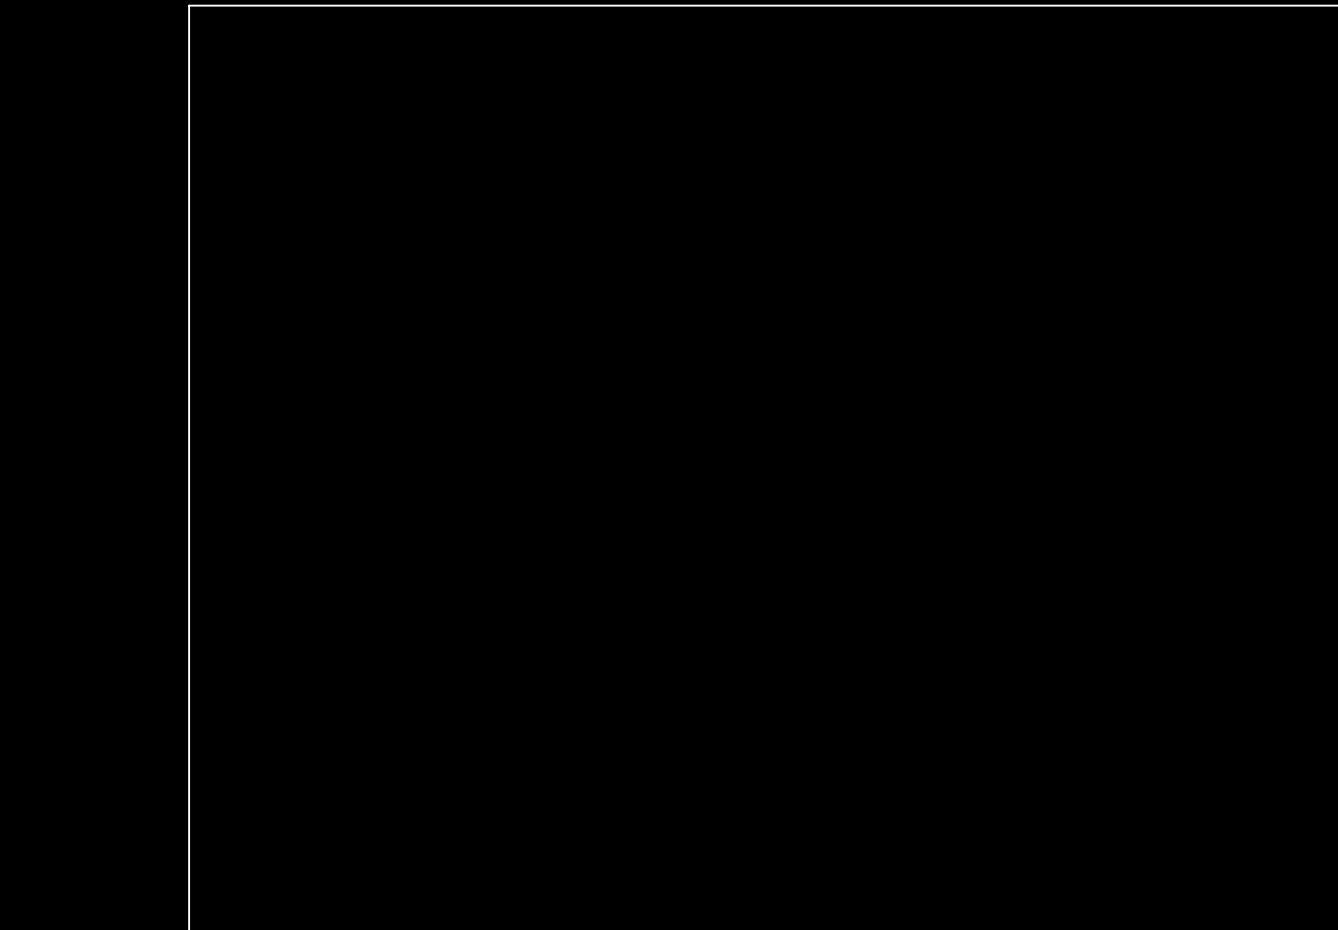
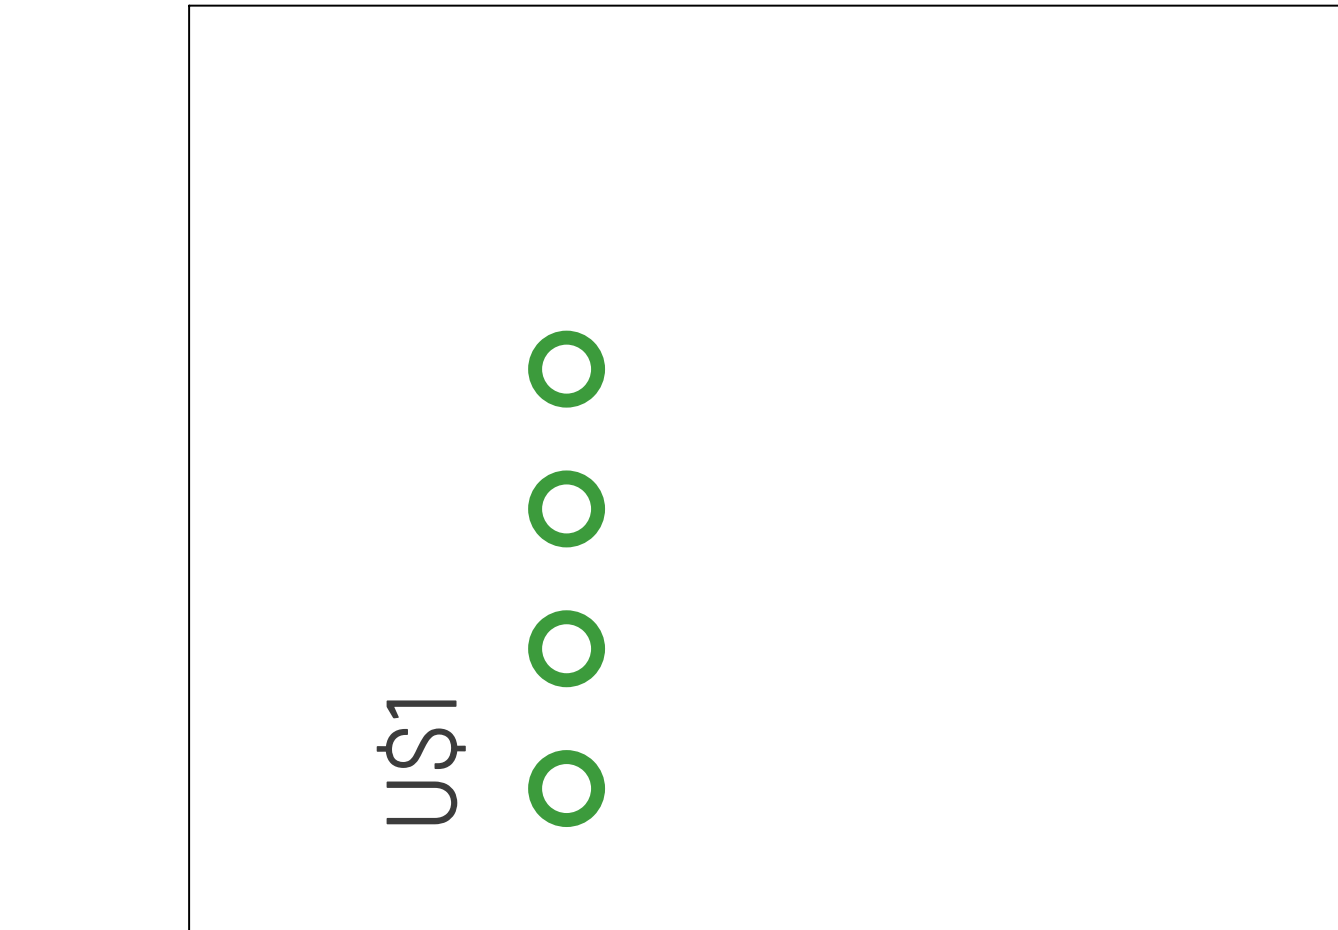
U$1: none -> (566, 578)

